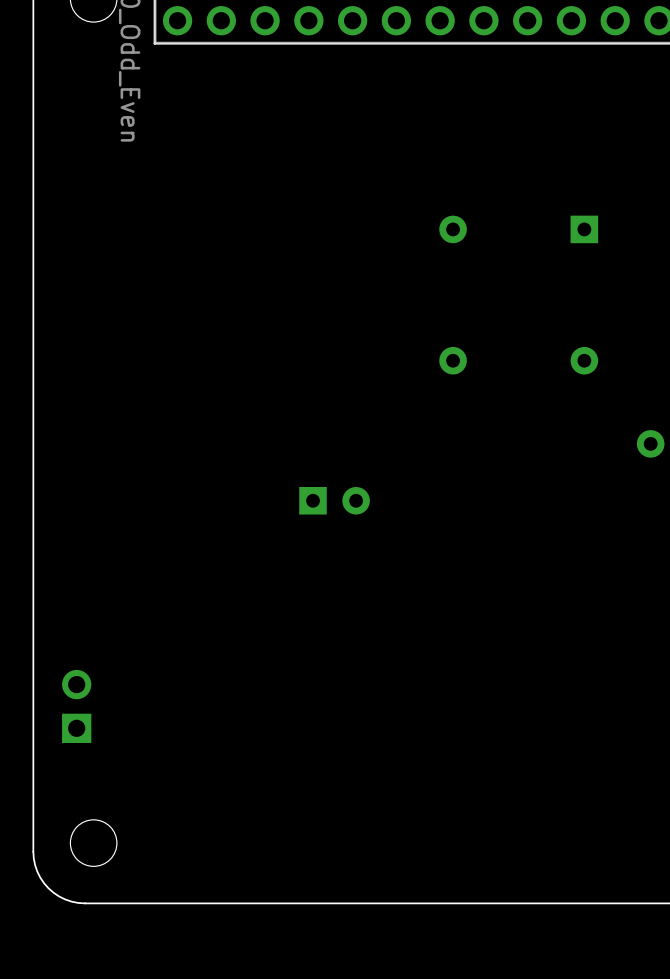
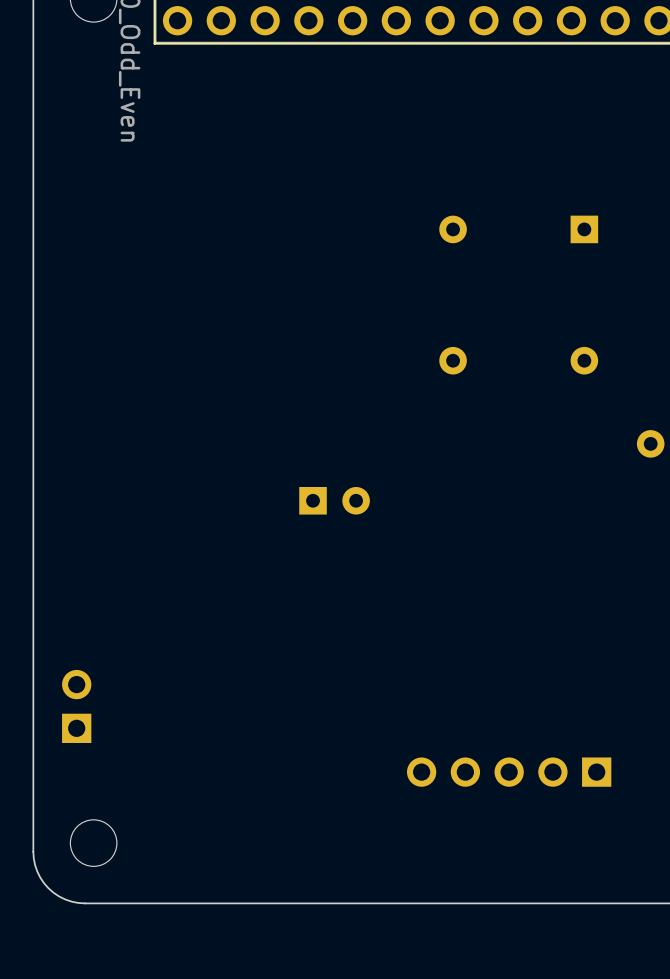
part: none -> (509, 772)

